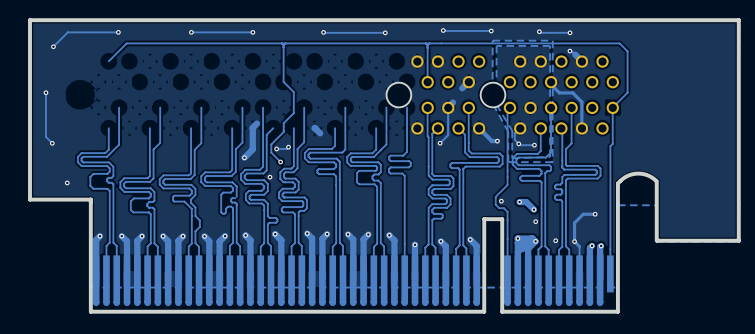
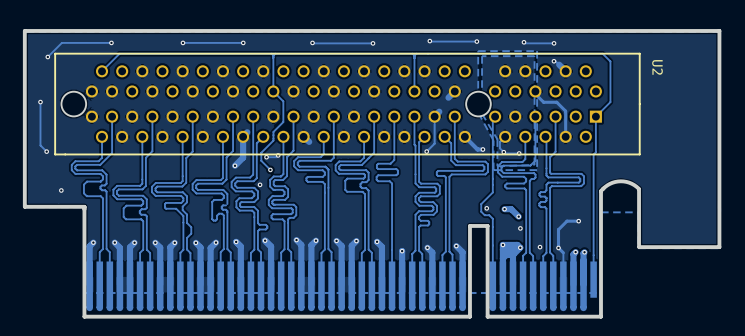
U2: none -> (347, 104)
part: (502, 95) -> none

